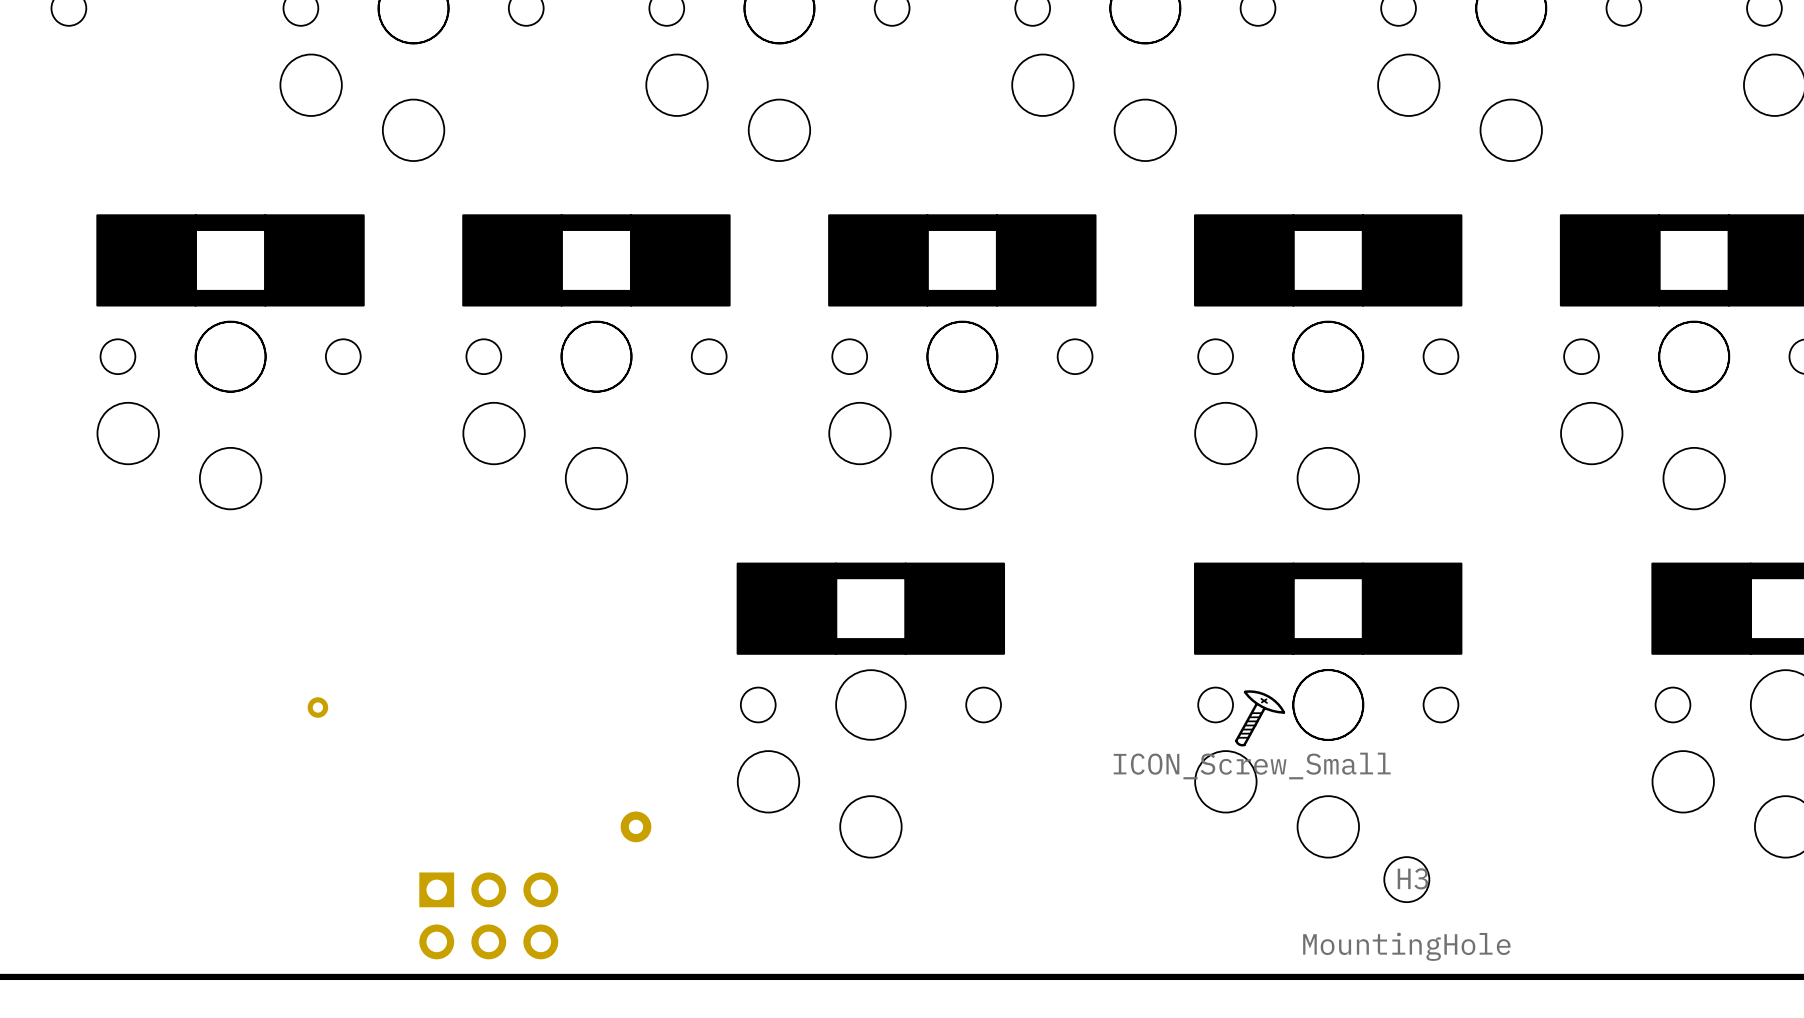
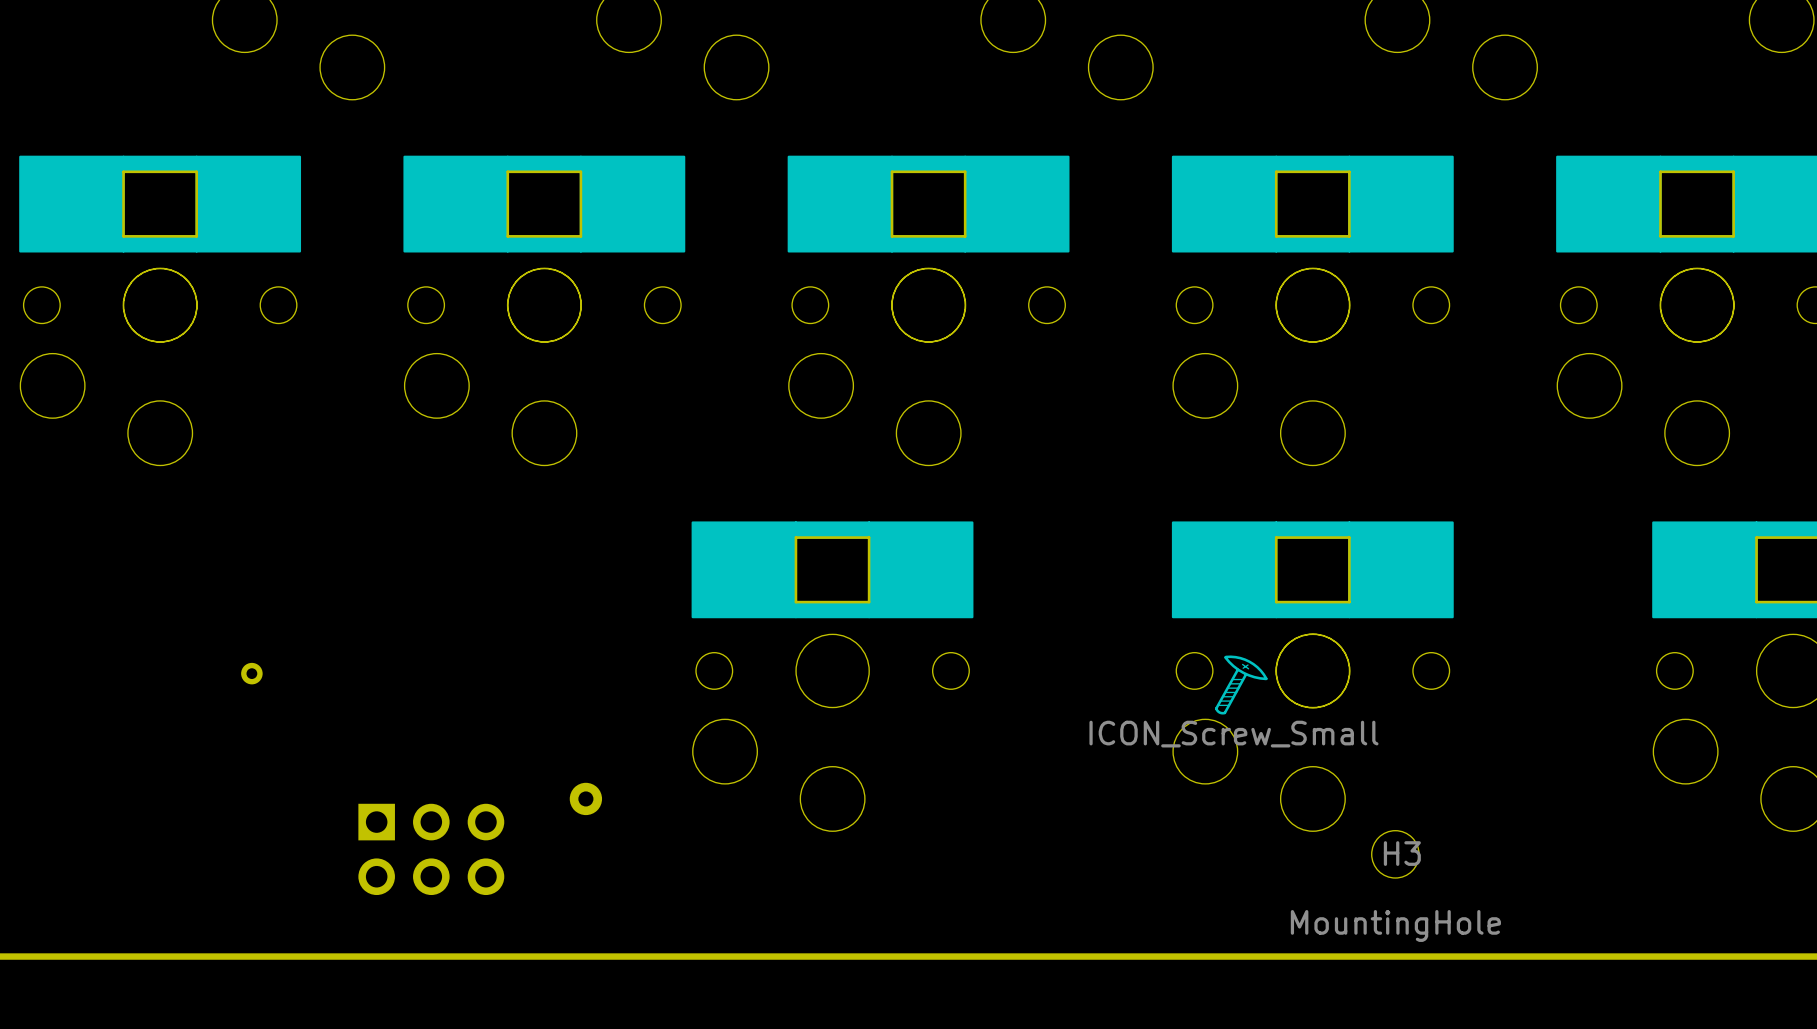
part position: (488, 915) -> (431, 849)

